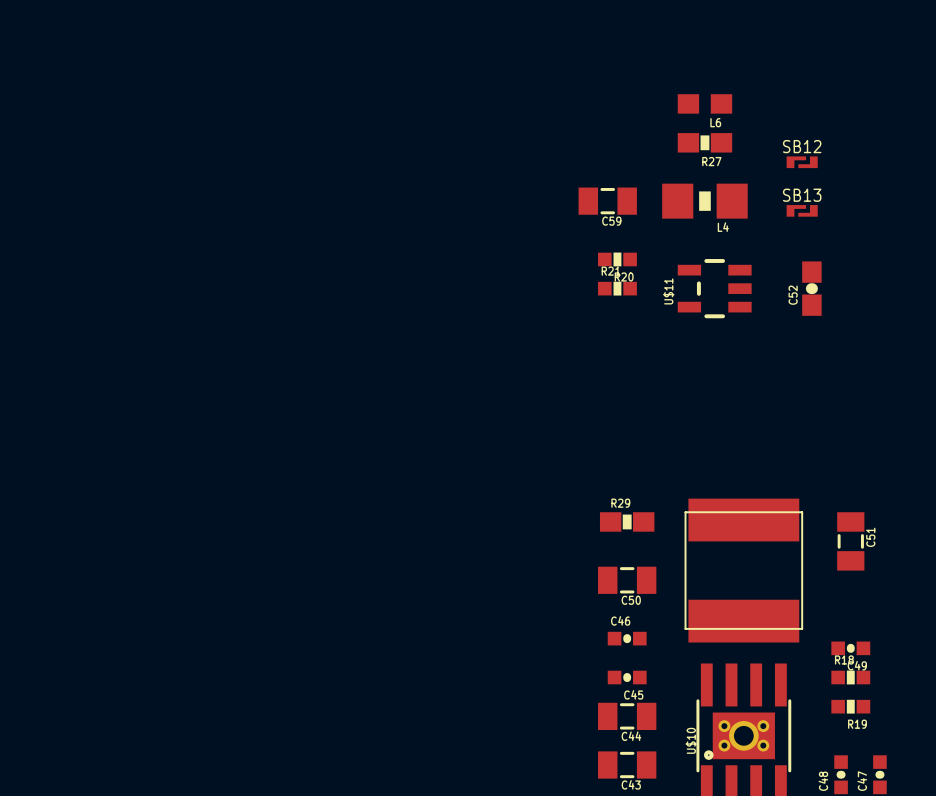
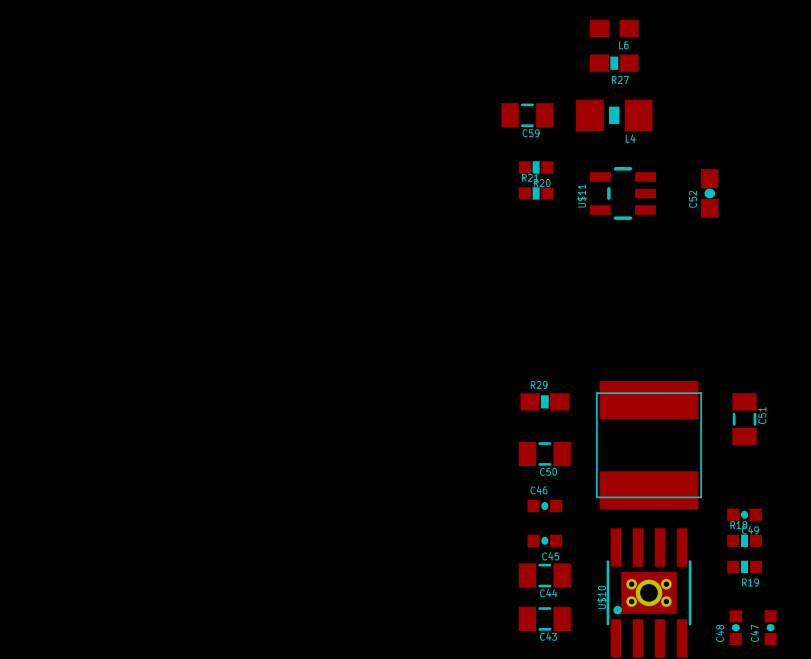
SB12: (802, 162) -> none
SB13: (802, 210) -> none

